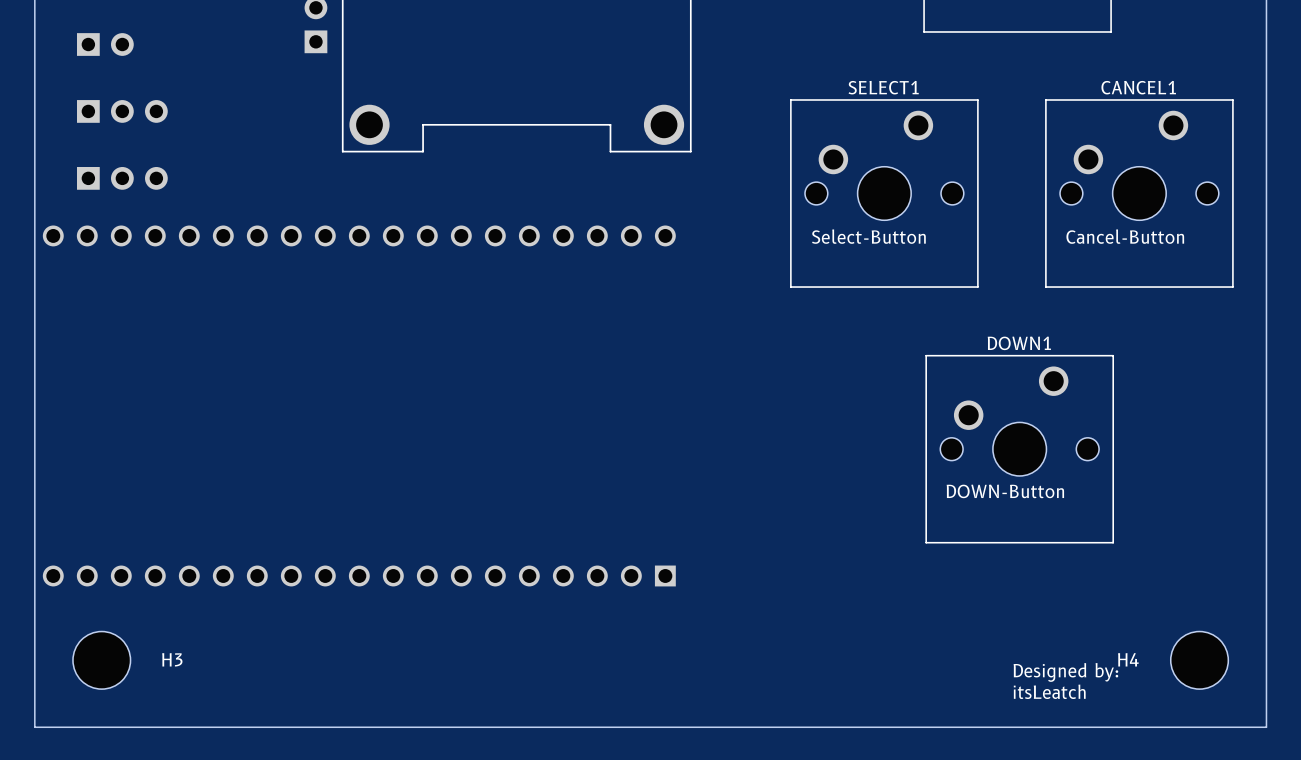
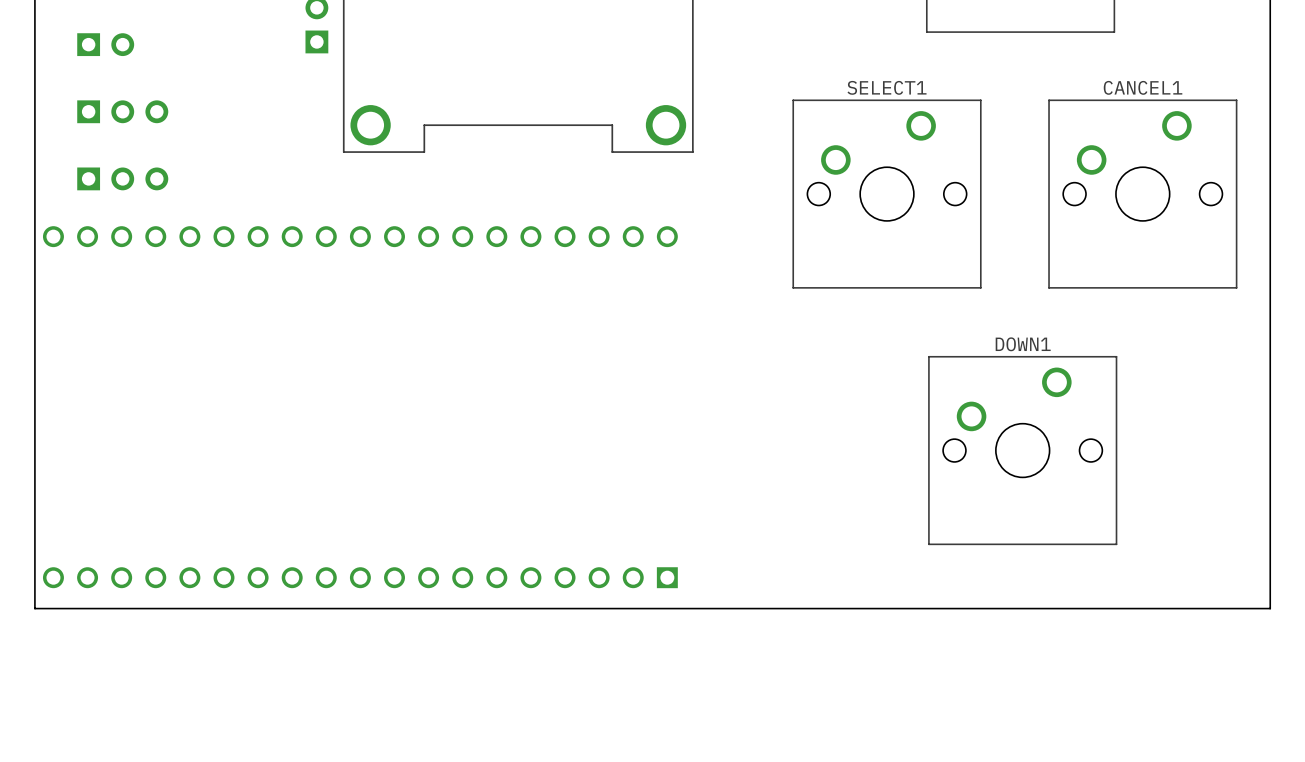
text: Select-Button (868, 236) -> none
text: Cancel-Button (1125, 236) -> none
text: DOWN-Button (1005, 491) -> none
board edge: (34, 606) (34, 727) (1266, 727) (1266, 606) -> (34, 608) (1270, 608)
H3: (101, 660) -> none
H4: (1199, 660) -> none
text: Designed by: (1065, 672) -> none
text: itsLeatch (1049, 691) -> none

